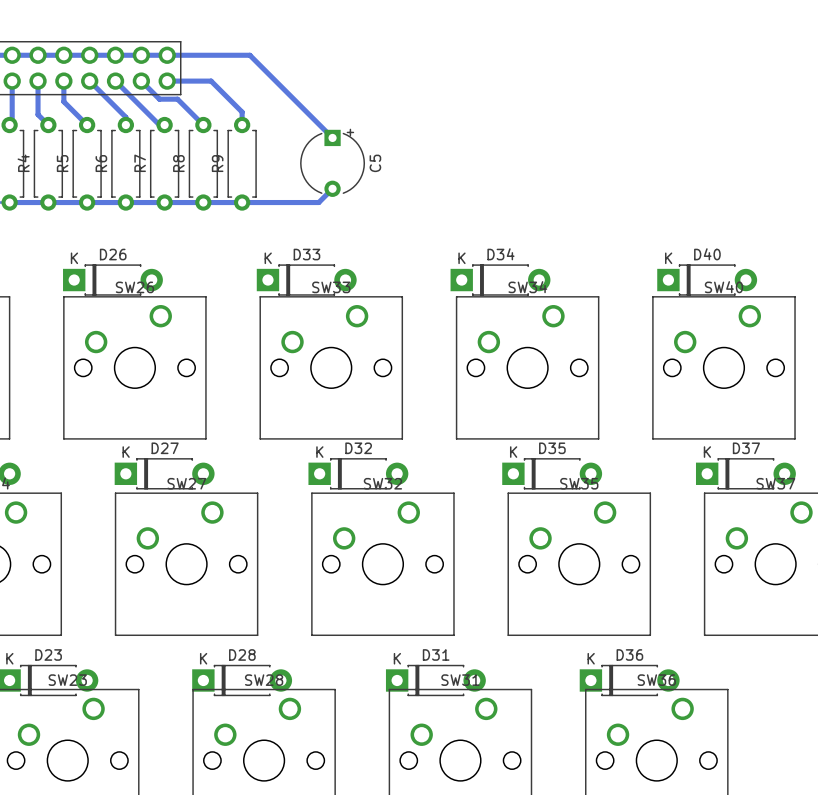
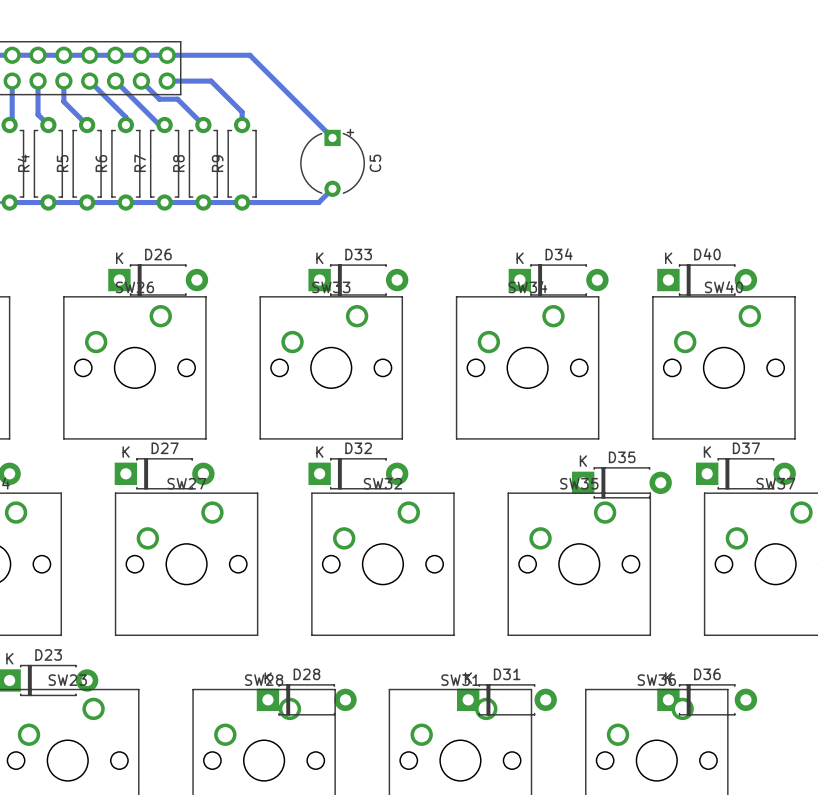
D26 position: (112, 280) -> (158, 280)
D33 position: (306, 280) -> (358, 280)
D34 position: (500, 280) -> (558, 280)
D35 position: (552, 473) -> (621, 482)
D28 position: (242, 680) -> (306, 699)
D31 position: (435, 680) -> (506, 699)
D36 position: (629, 680) -> (707, 699)

